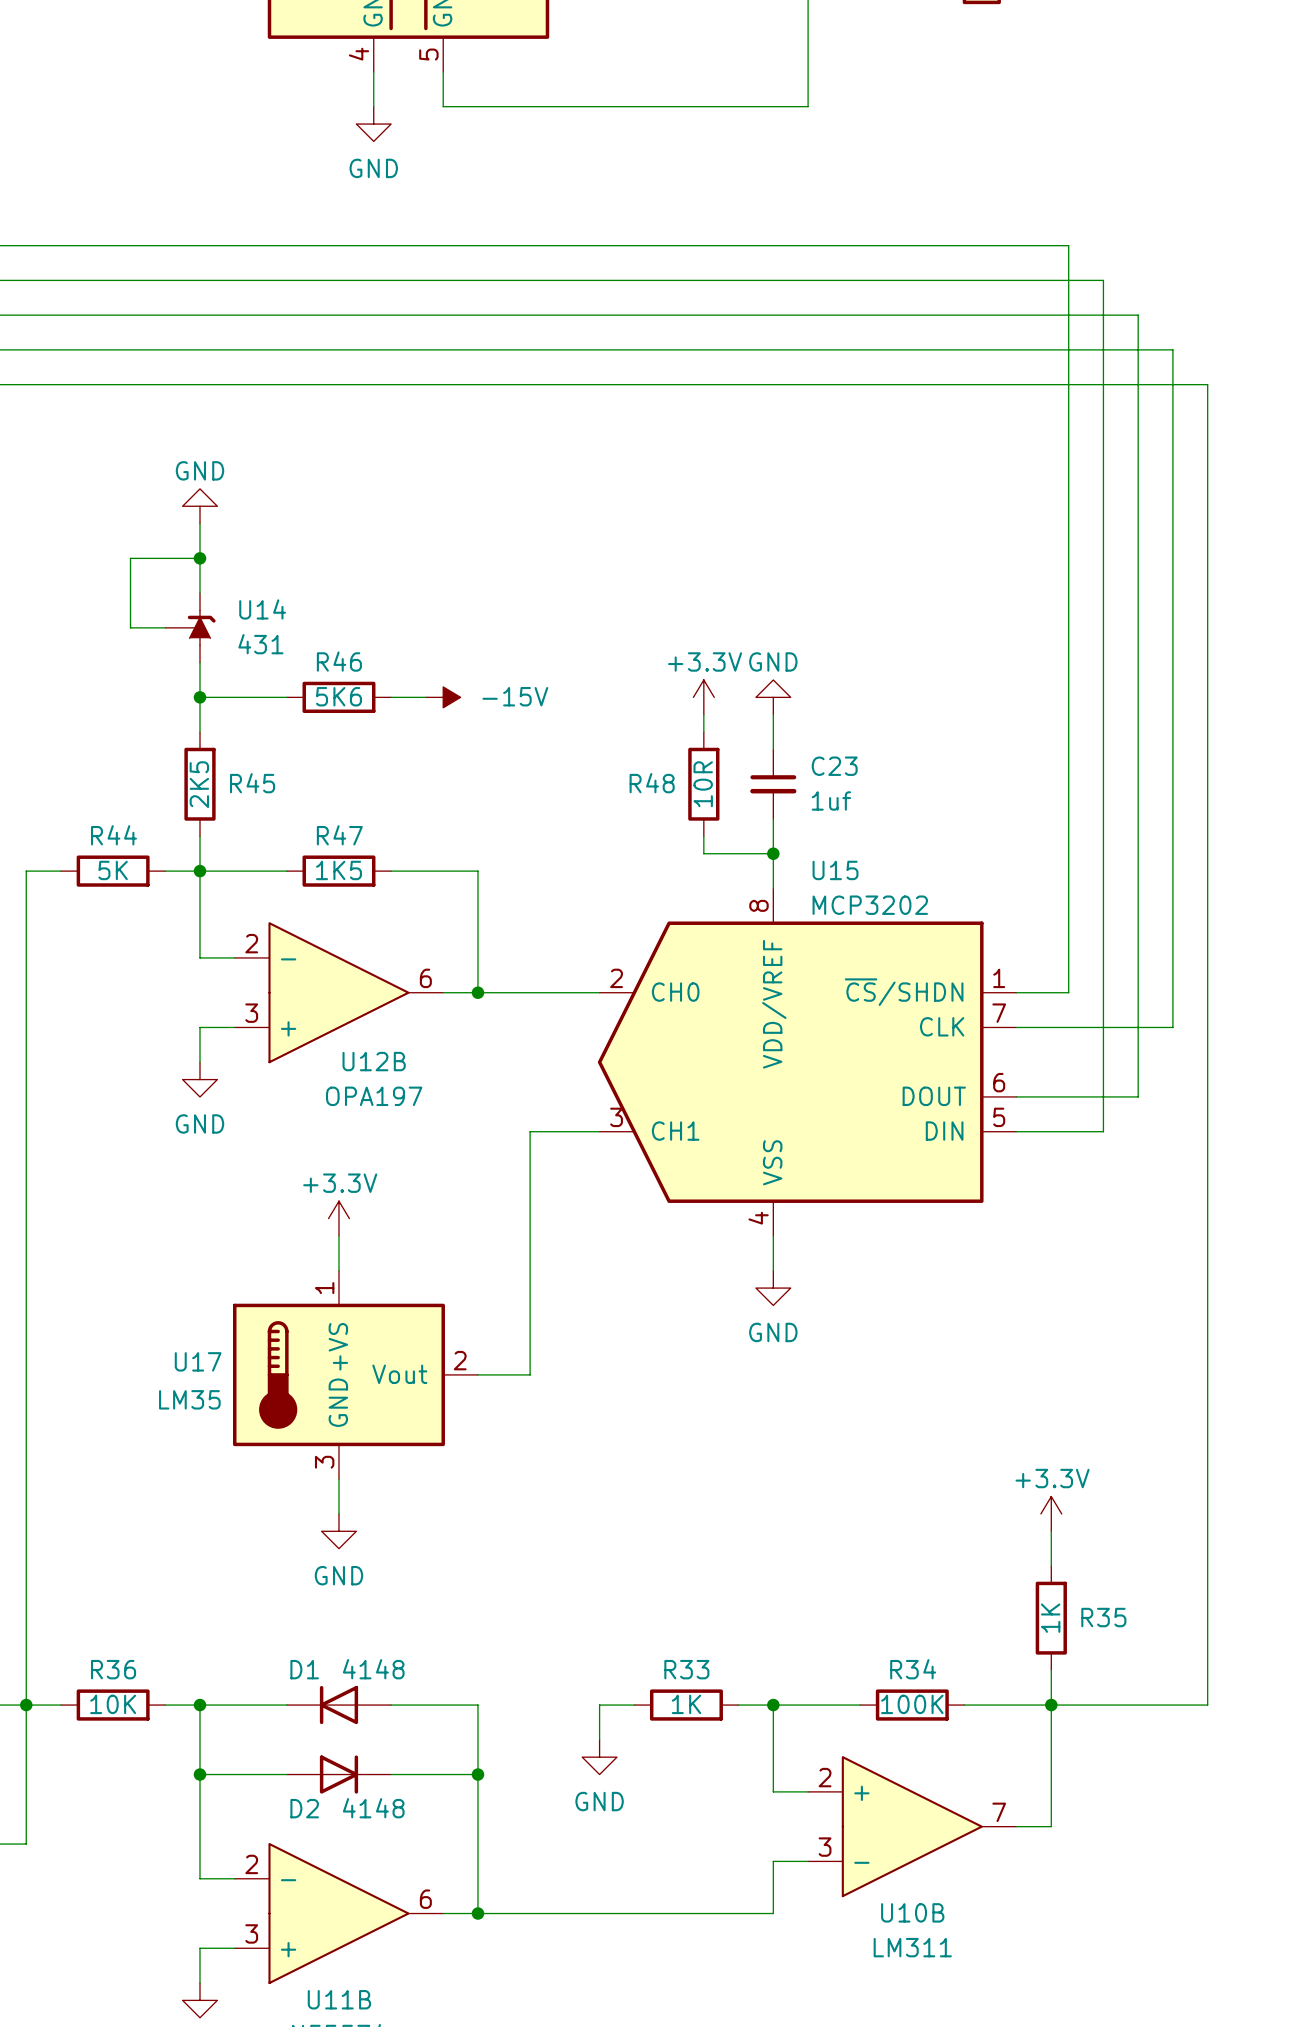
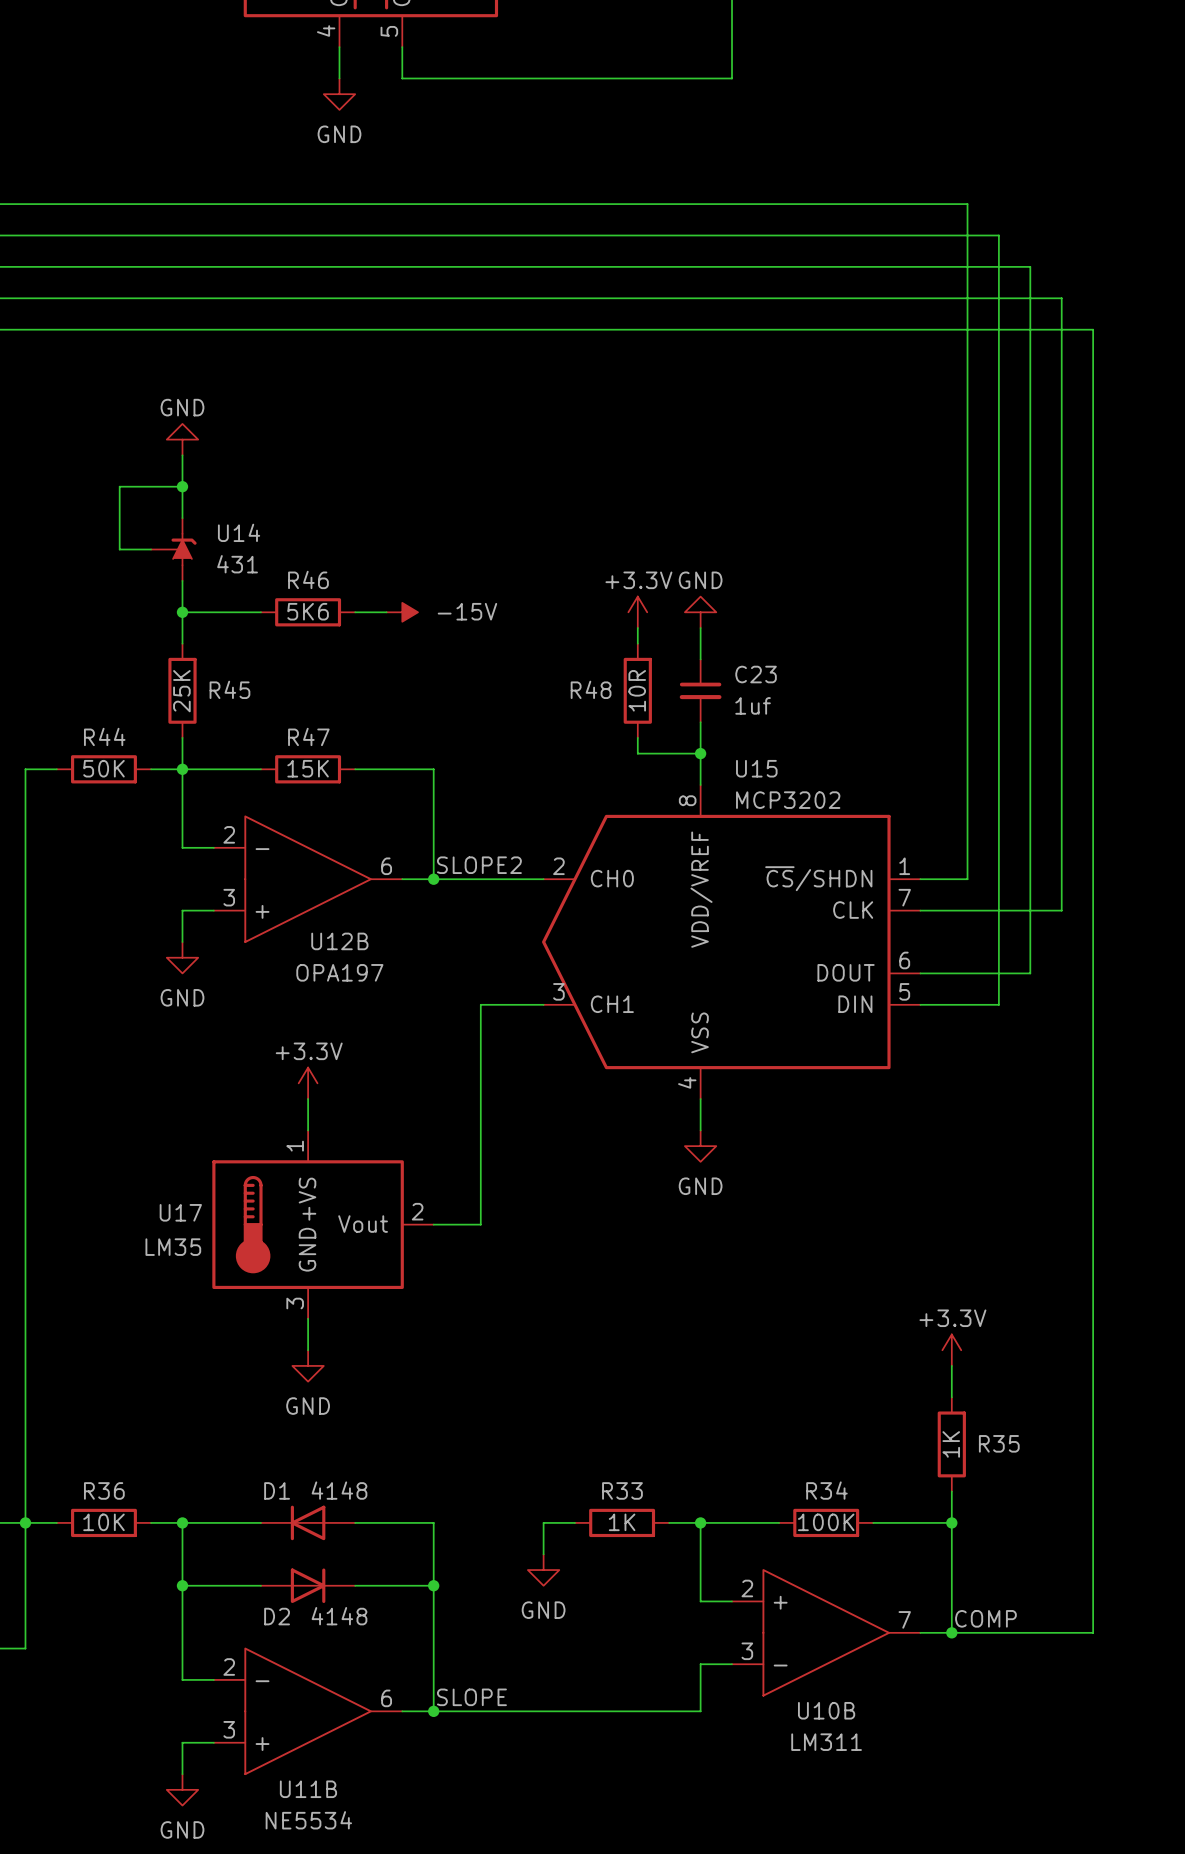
R45 value: 2K5 (199, 784) -> 25K (181, 691)
R44 value: 5K (113, 870) -> 50K (103, 768)
R47 value: 1K5 (338, 870) -> 15K (308, 768)
label: none -> SLOPE2 (479, 865)
wire: (1051, 1705) (1207, 1705) -> (951, 1632) (1093, 1632) (1093, 1522)
label: none -> COMP (985, 1618)
junction: none -> (951, 1632)
label: none -> SLOPE (471, 1697)

